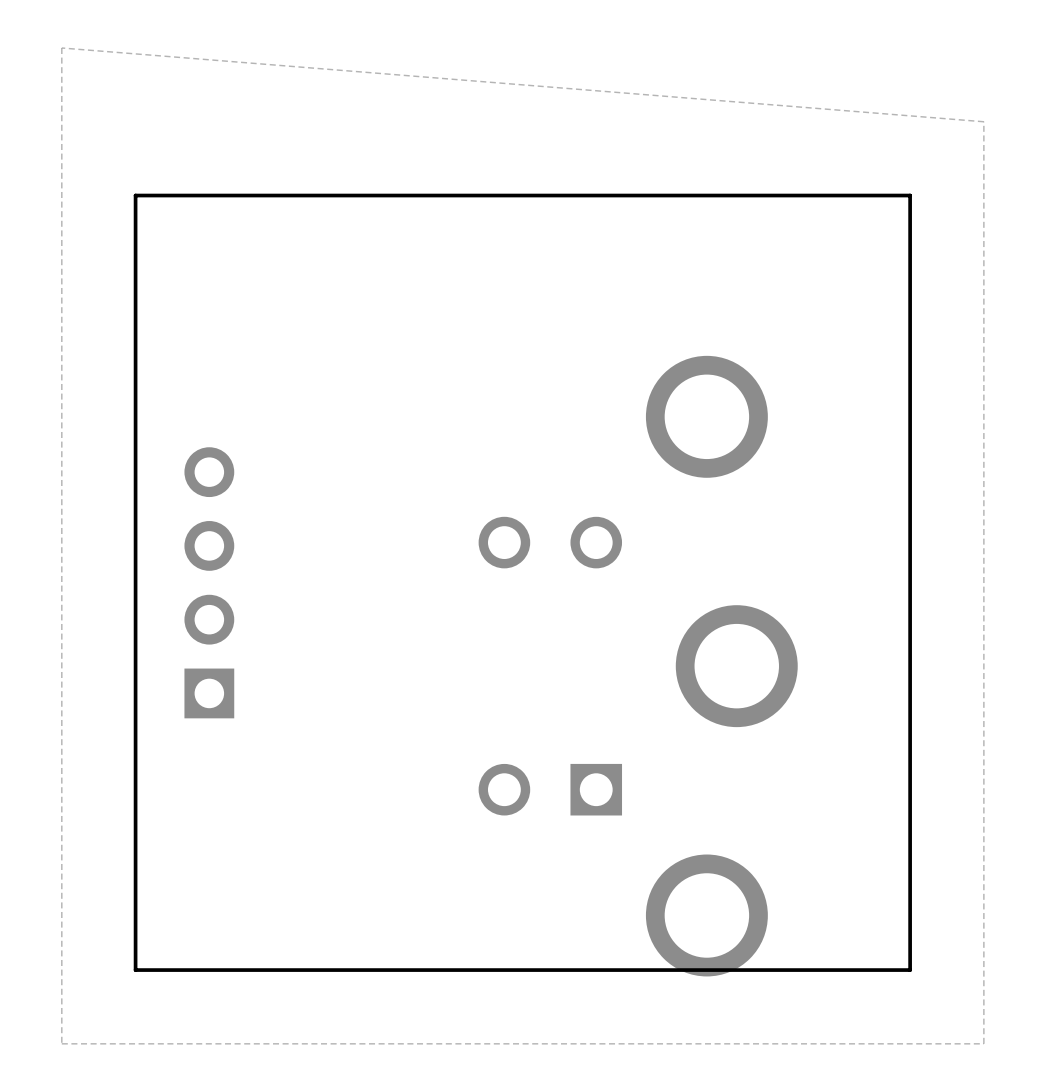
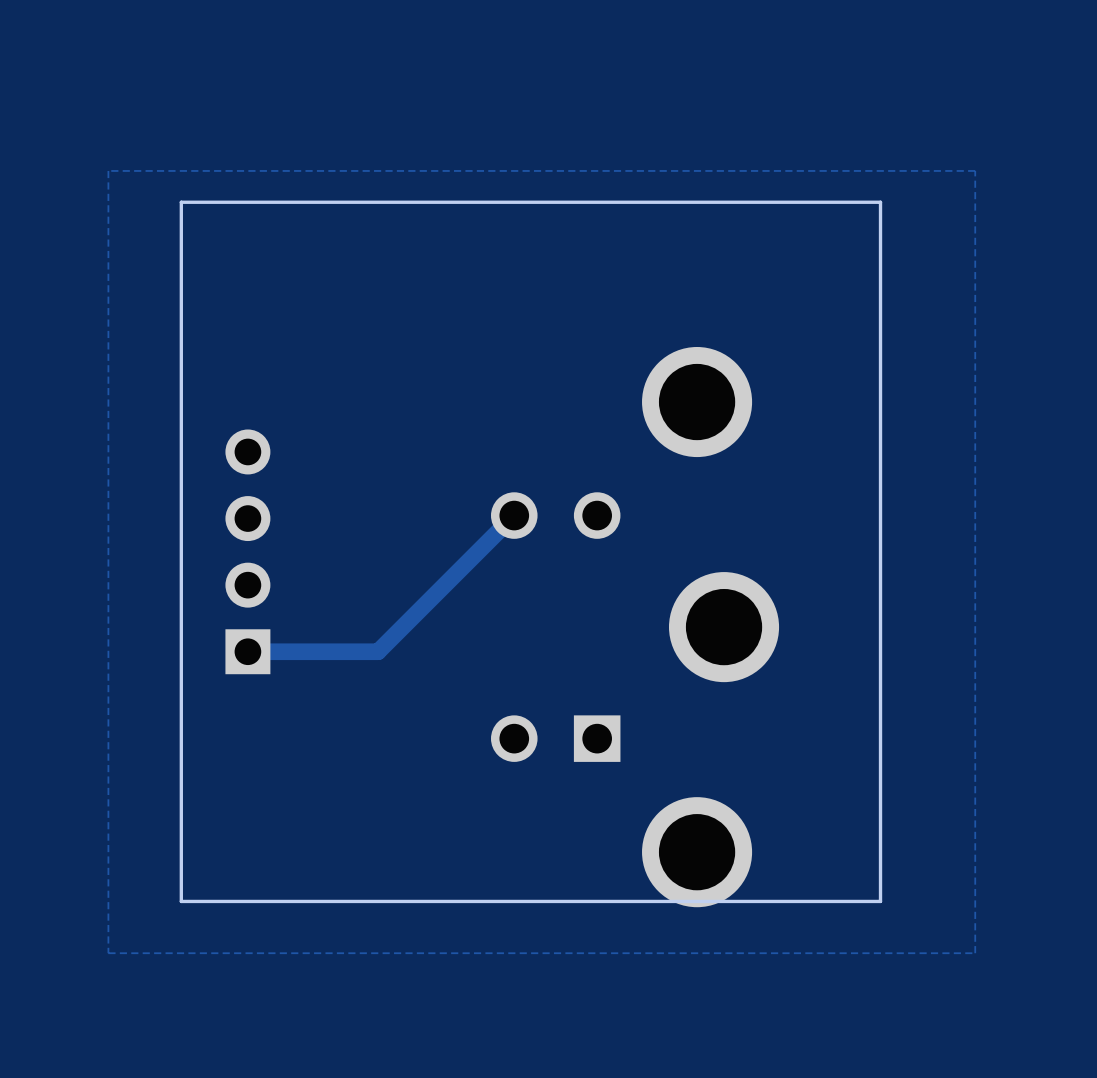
zone outline: (61, 47) (61, 1043) (983, 1043) (983, 121) (61, 47) -> (975, 170) (975, 953) (108, 953) (108, 170) (975, 170)
track: none -> (514, 515) (378, 651) (247, 651)

